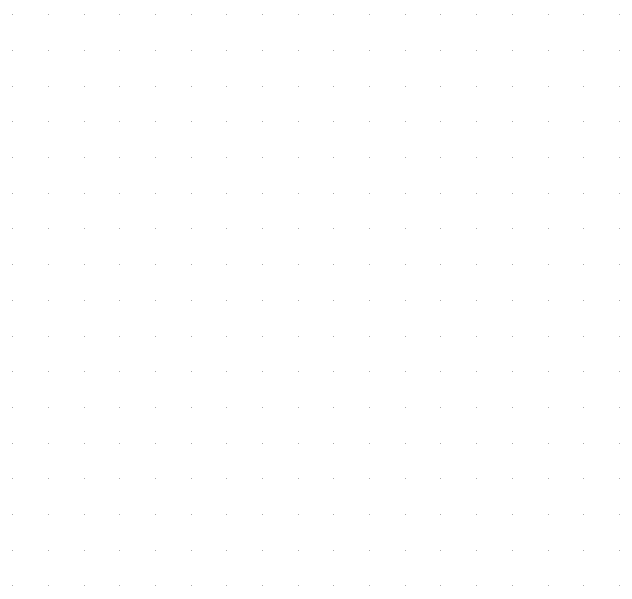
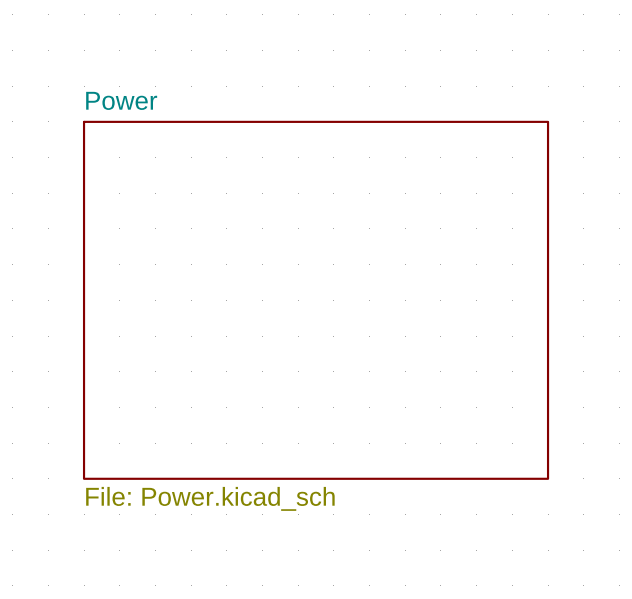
sheet Power: none -> File: Power.kicad_sch (316, 300)

